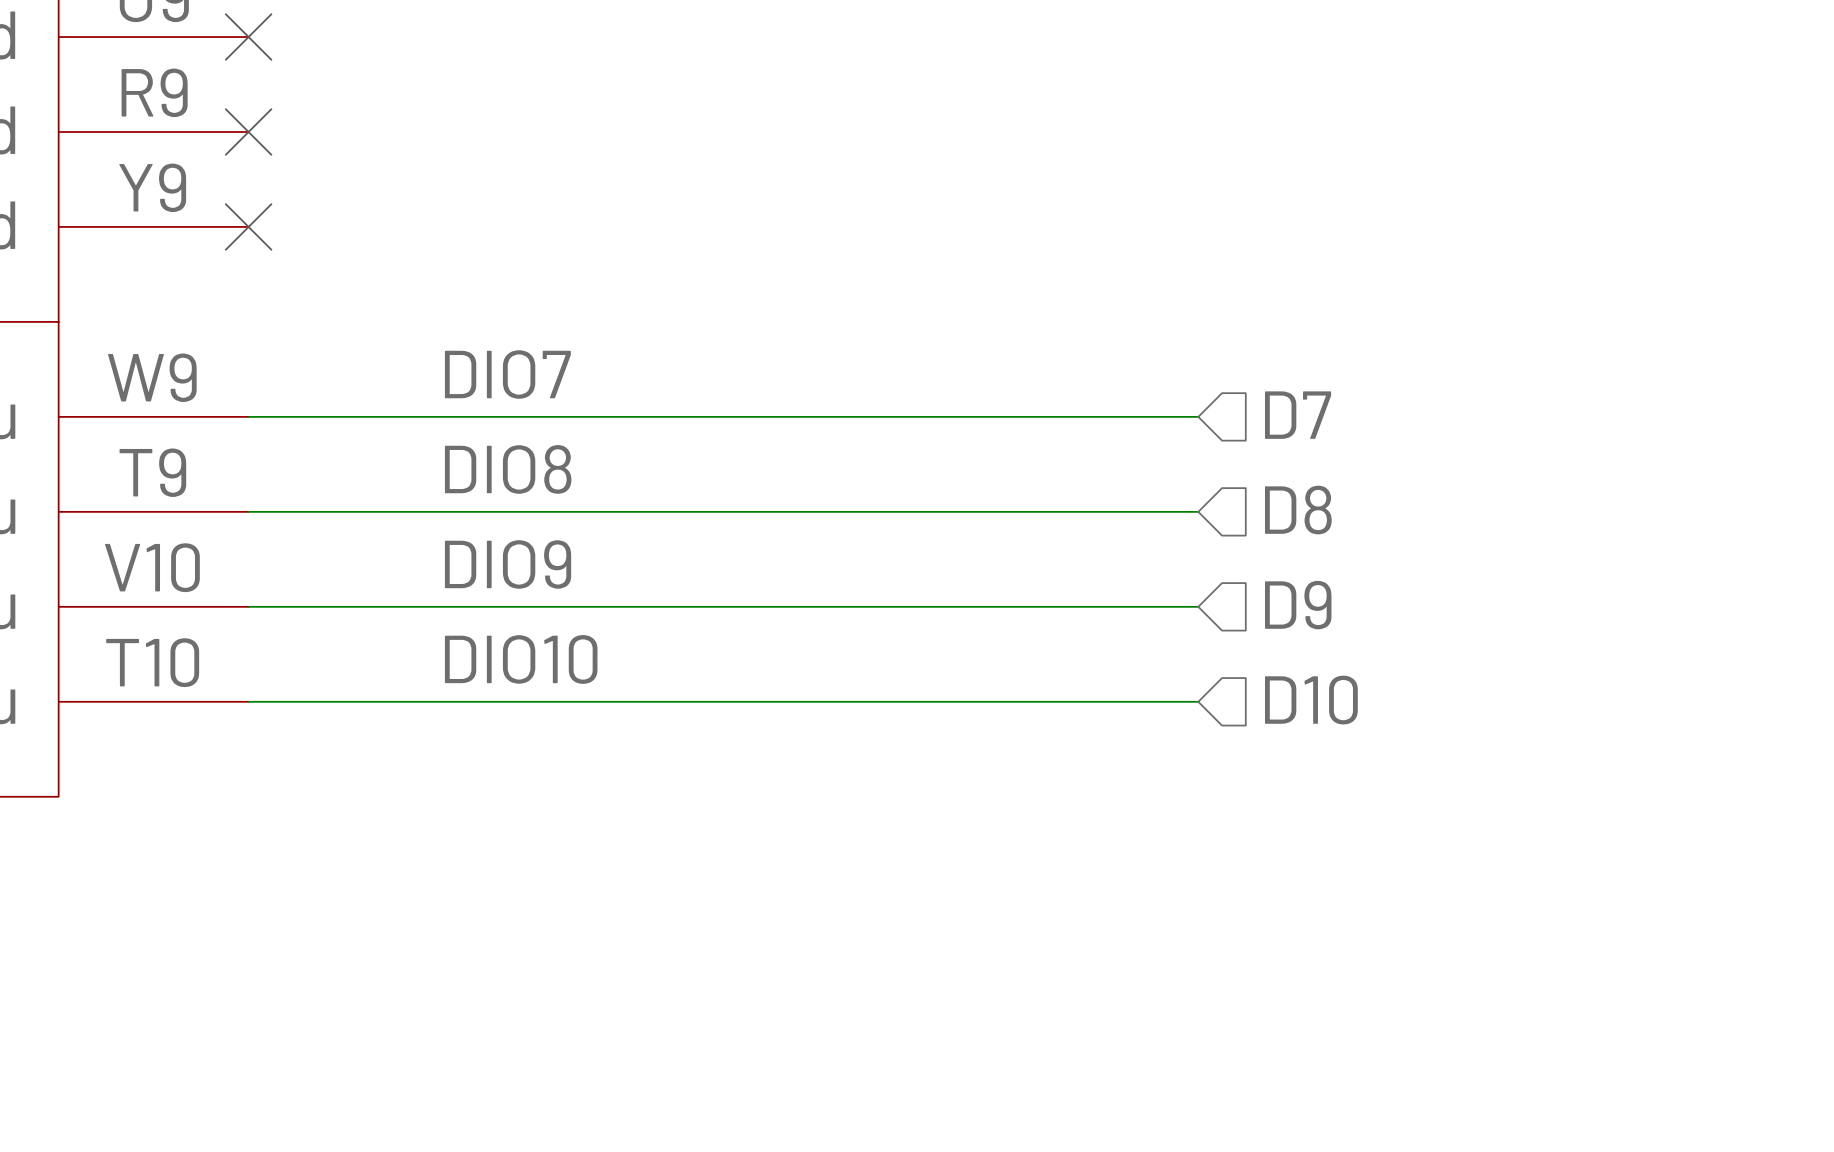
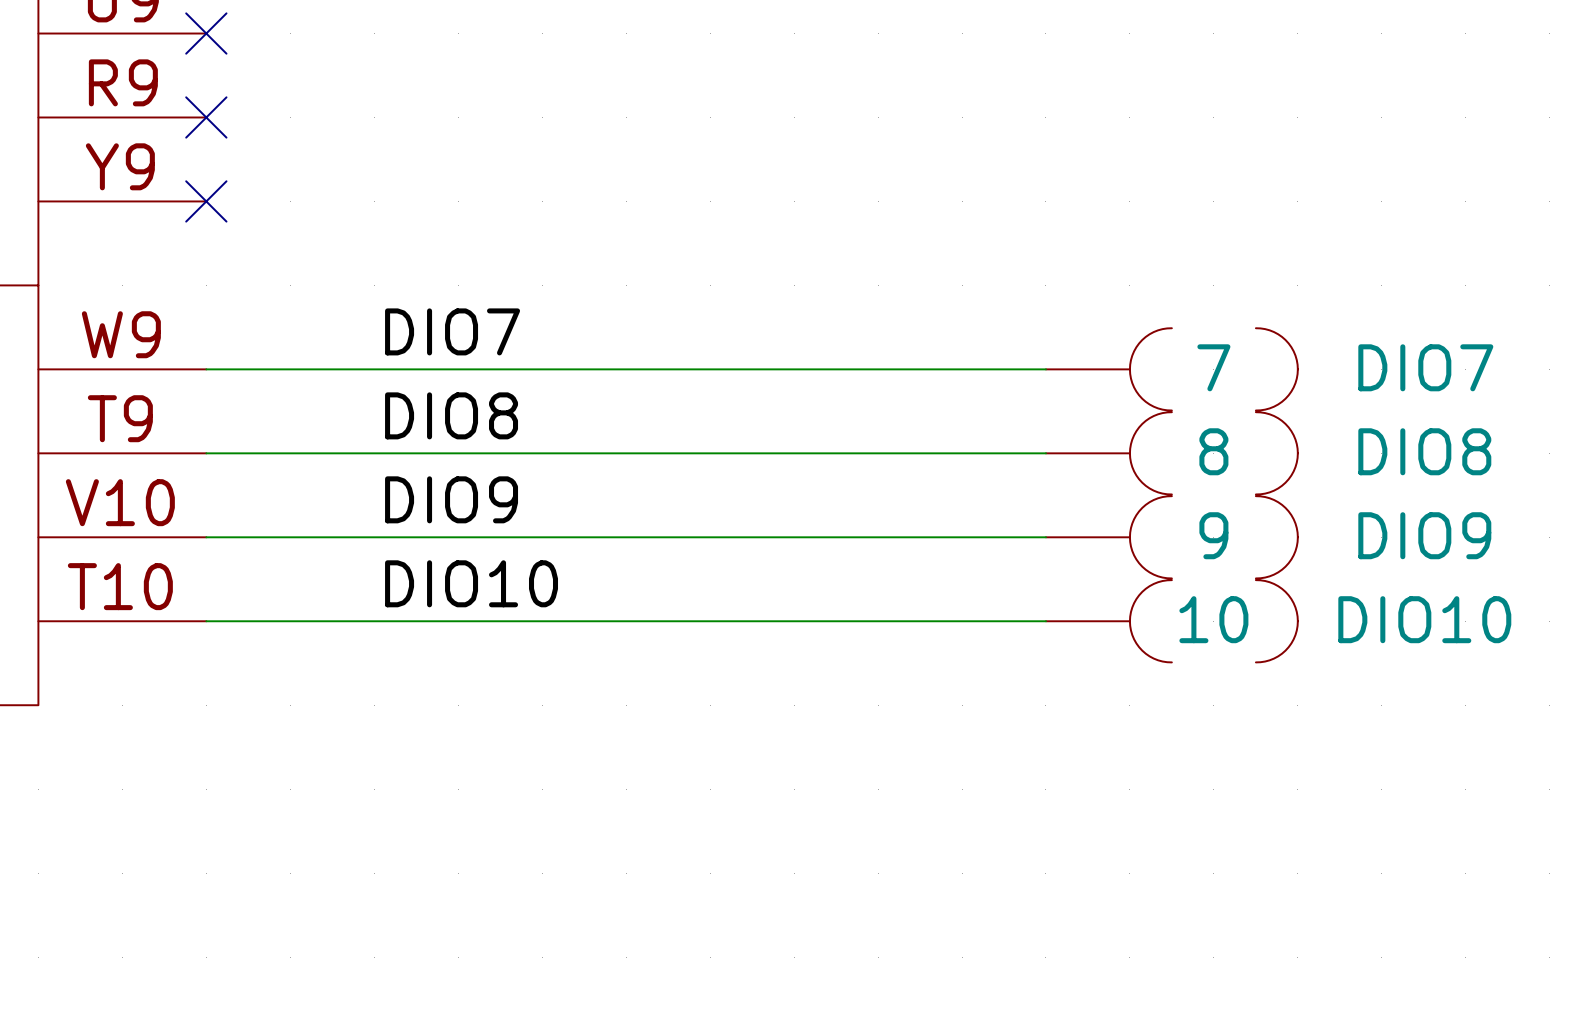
hierarchical label: D7 (1298, 415) -> none
DIO7: none -> 7 (1171, 369)
hierarchical label: D8 (1298, 510) -> none
DIO8: none -> 8 (1171, 453)
hierarchical label: D9 (1298, 605) -> none
DIO9: none -> 9 (1171, 537)
hierarchical label: D10 (1311, 700) -> none
DIO10: none -> 10 (1171, 621)

